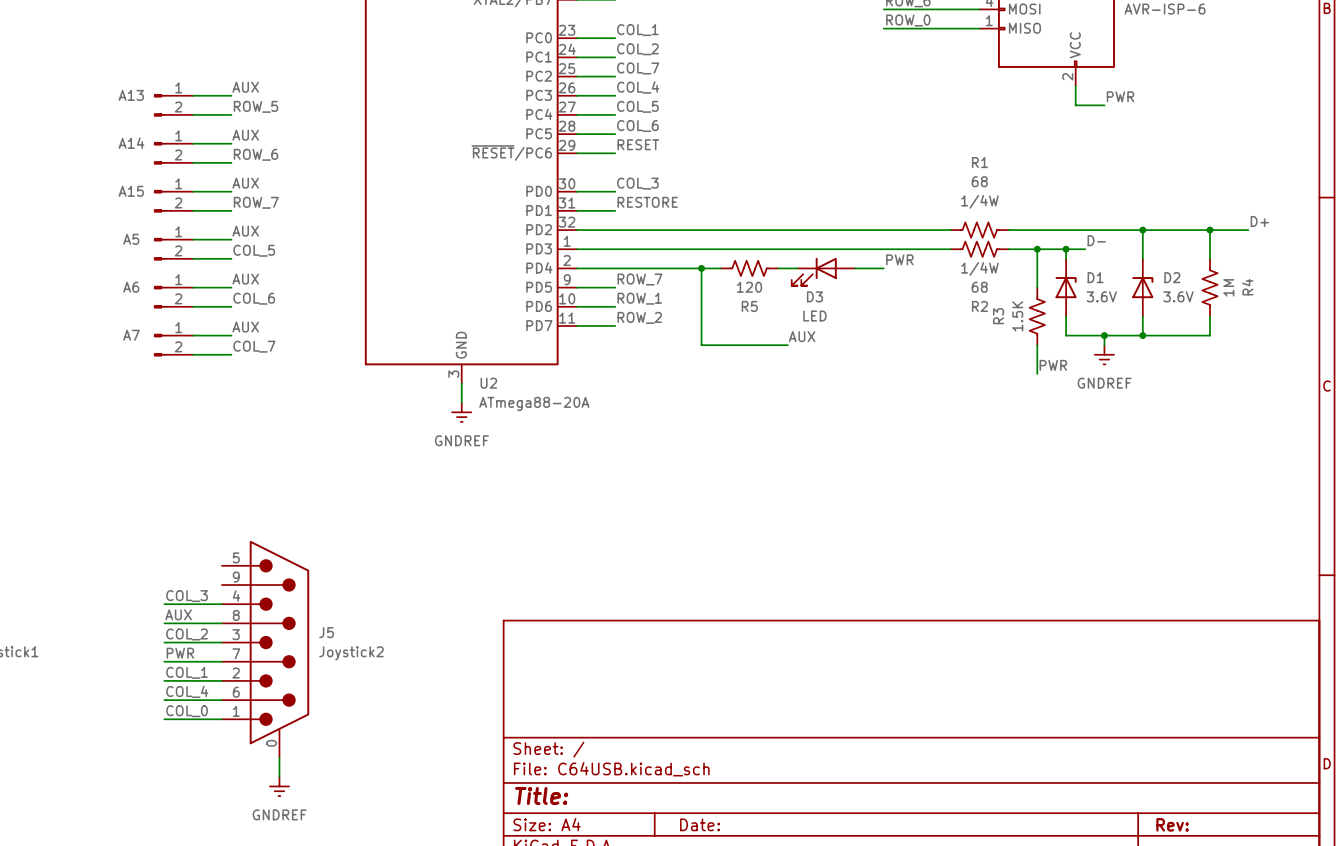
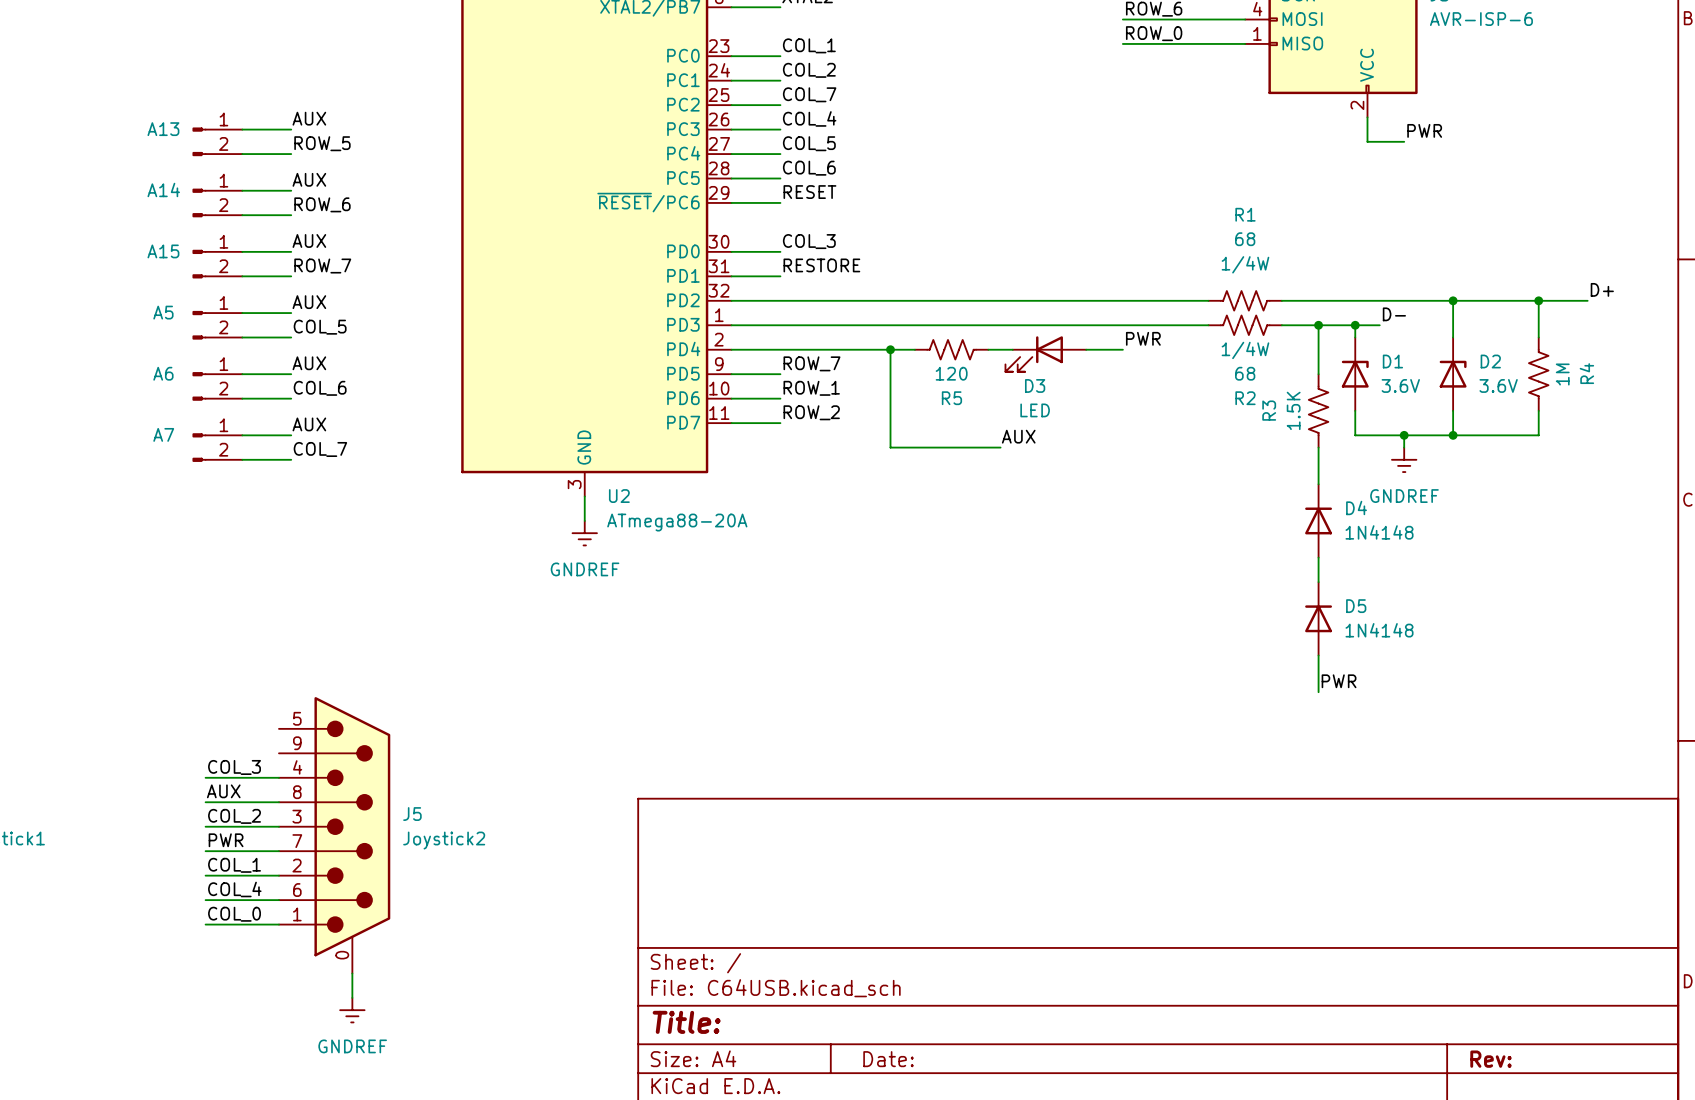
label position: PWR (1053, 365) -> PWR (1339, 681)
D4: none -> 1N4148 (1318, 520)
wire: none -> (1318, 557) (1318, 582)
D5: none -> 1N4148 (1318, 618)
wire: none -> (1318, 655) (1318, 692)

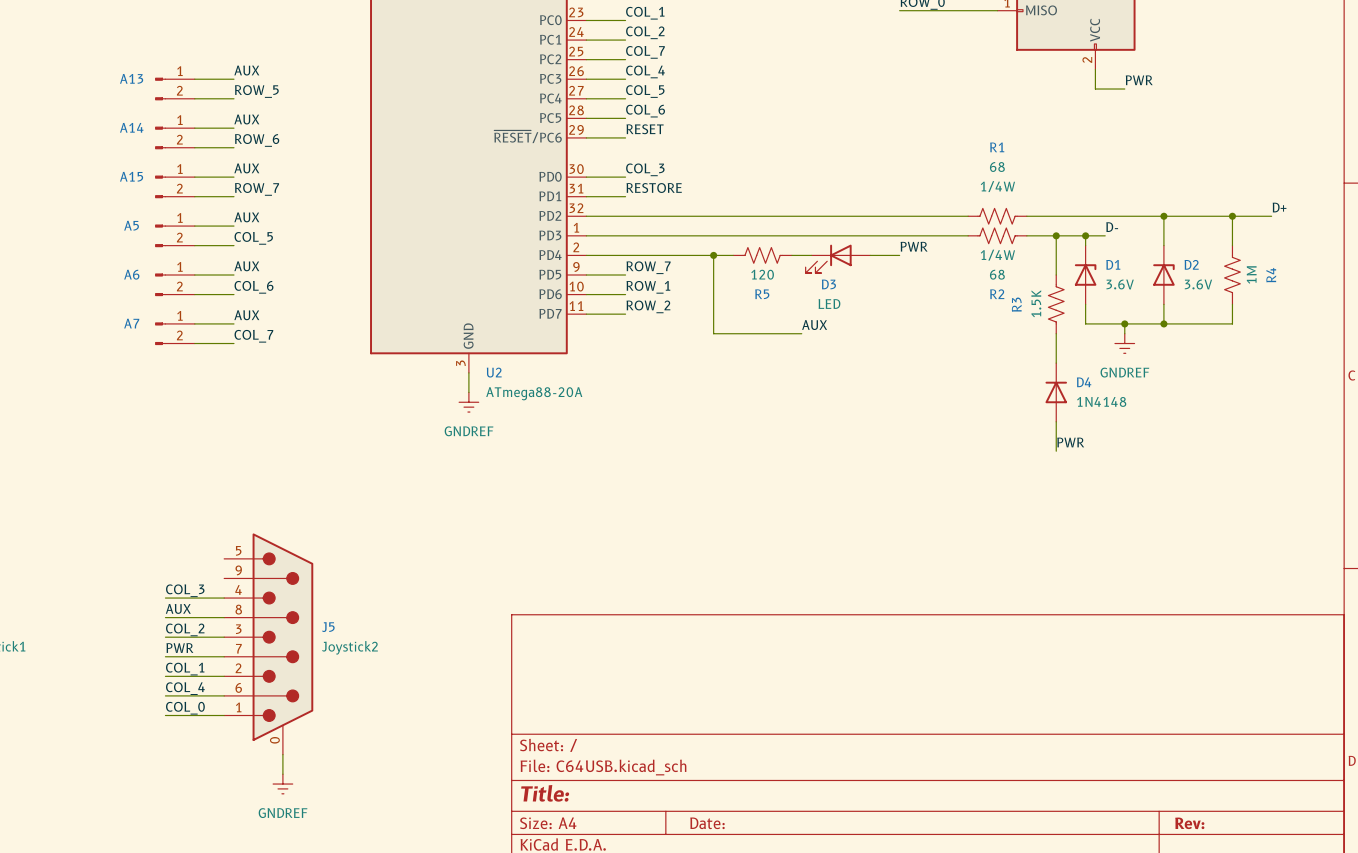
D5: 1N4148 (1318, 618) -> none
wire: (1318, 655) (1318, 692) -> none
label position: PWR (1339, 681) -> PWR (1070, 442)

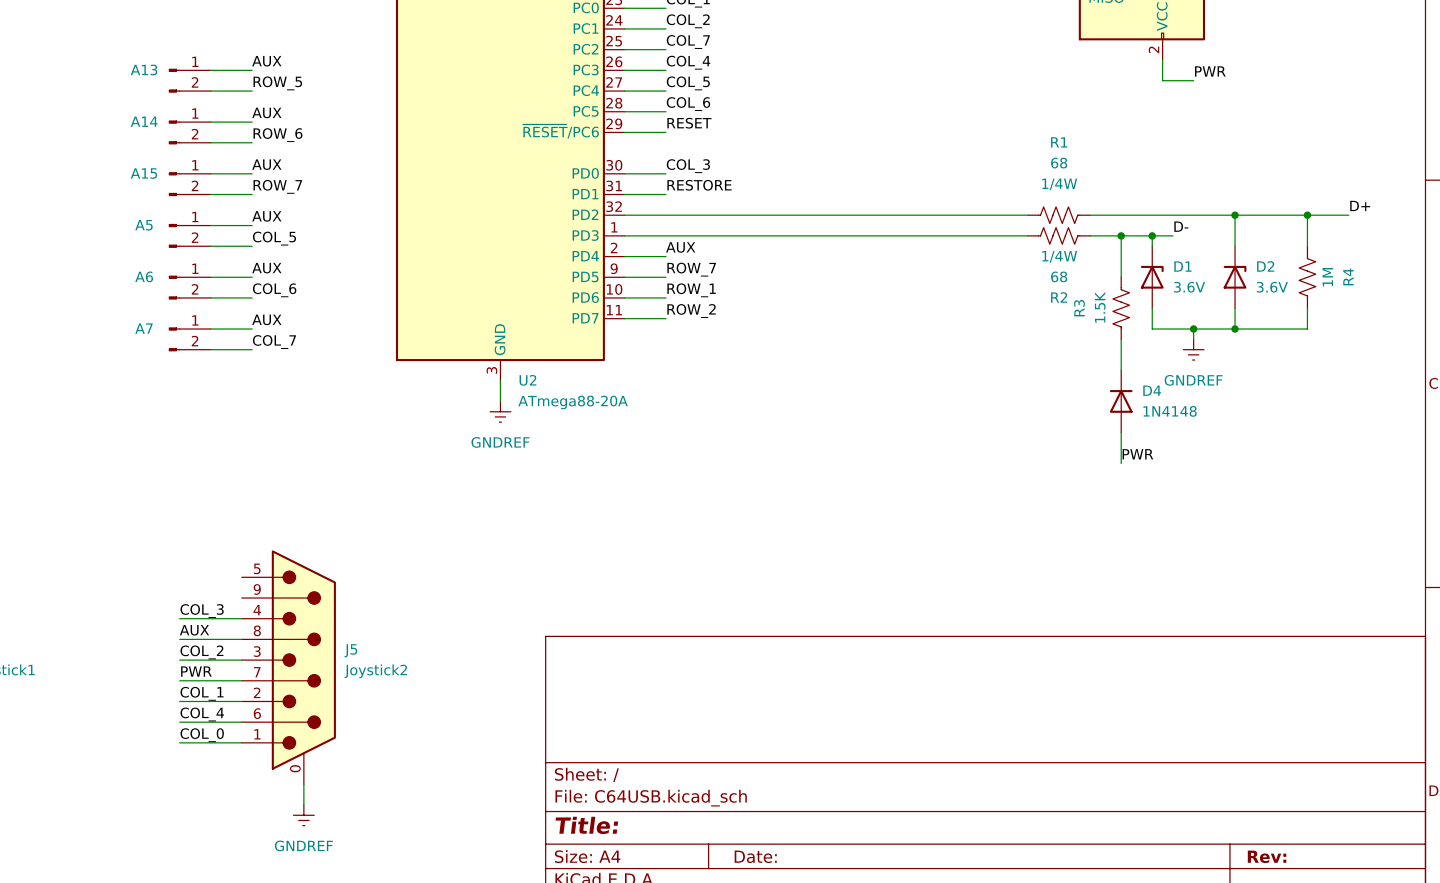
label: none -> AUX (680, 247)
label: PWR (914, 246) -> none
wire: (625, 255) (733, 255) -> none
wire: (713, 255) (713, 333) (801, 333) -> none
junction: (713, 255) -> none
R5: 120 (762, 255) -> none
wire: (791, 255) (811, 255) -> none
wire: (870, 255) (899, 255) -> none
D3: LED (837, 258) -> none
label: AUX (814, 325) -> none

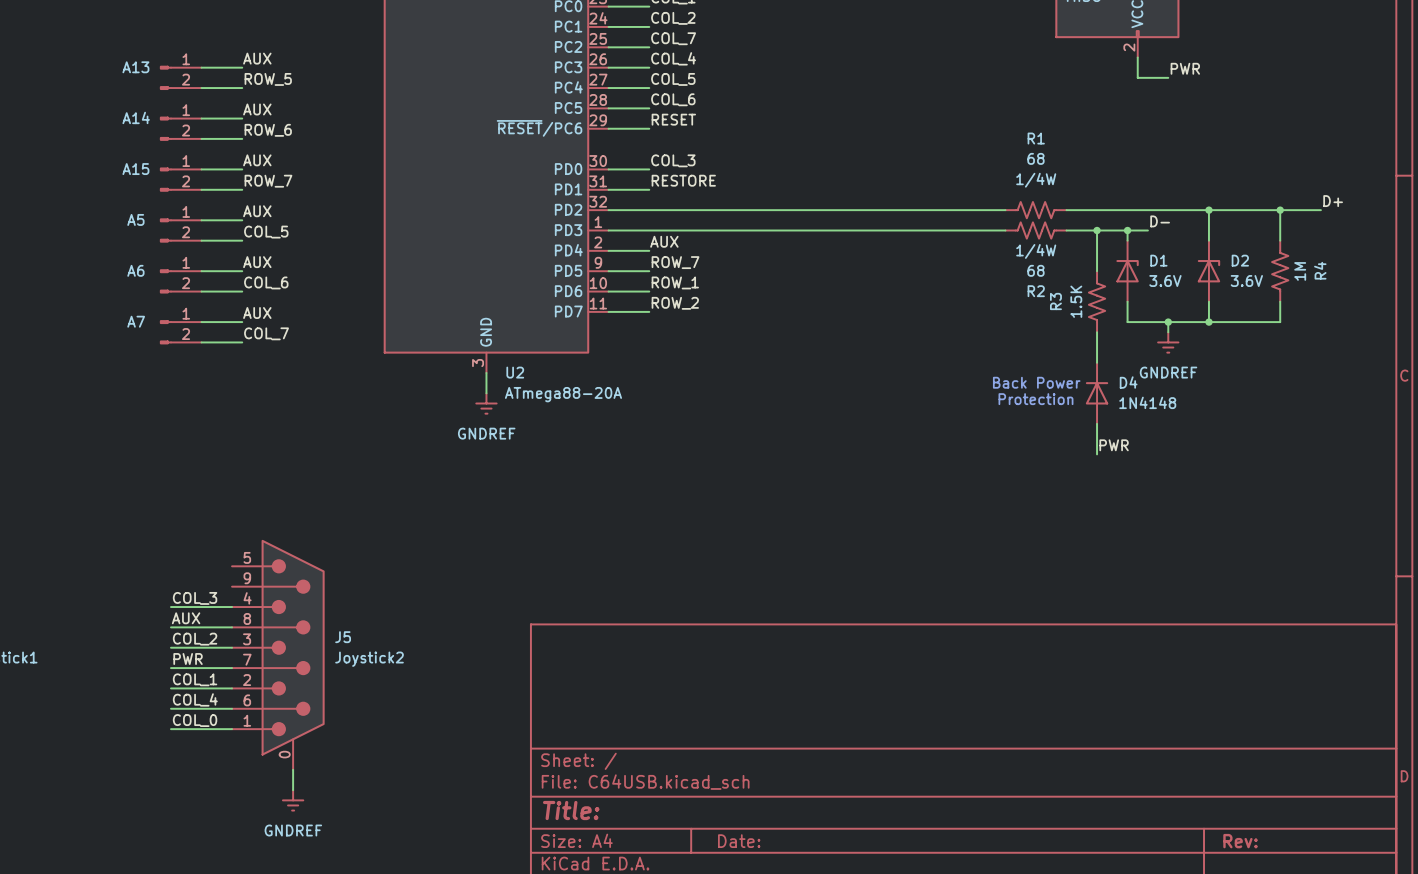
text: none -> Back Power (1036, 382)
text: none -> Protection (1035, 399)

